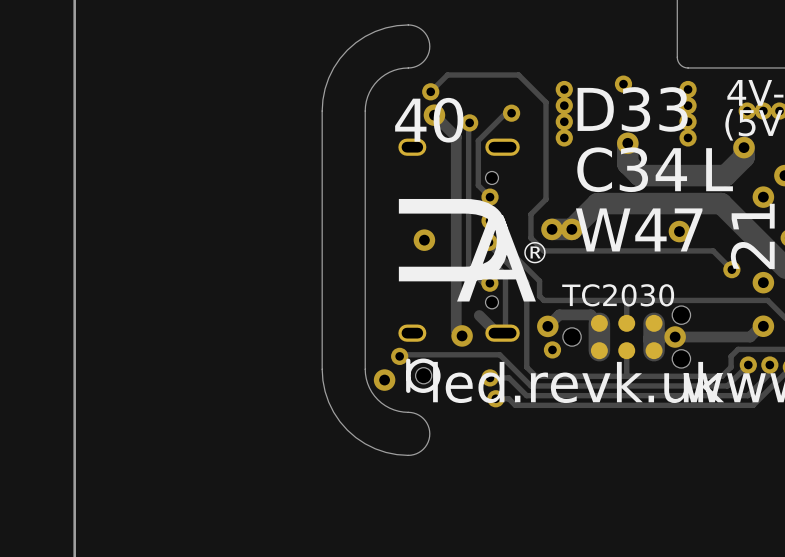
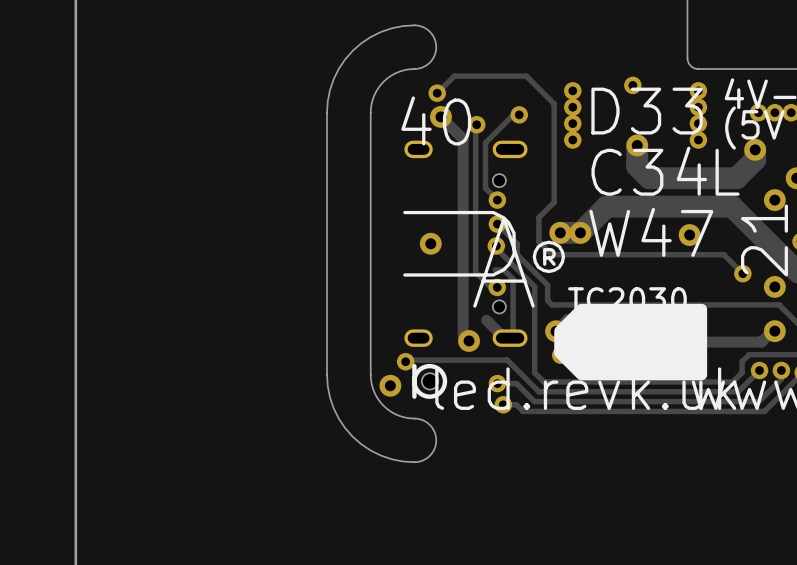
part footprint: [562, 306, 691, 369] -> [554, 303, 708, 381]

